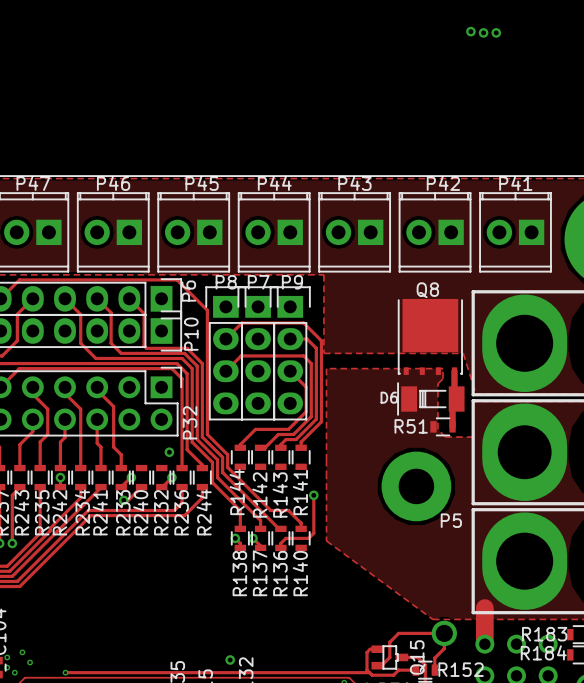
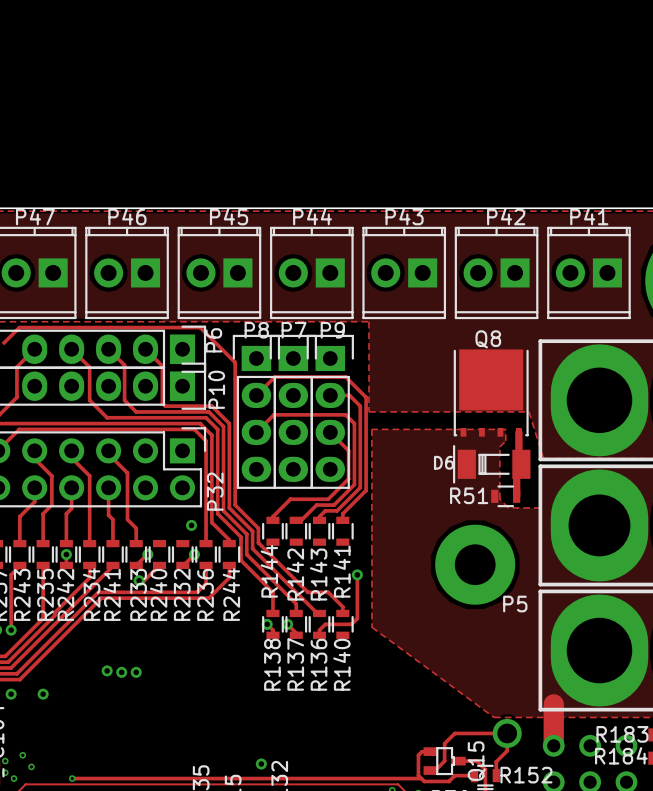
via: (470, 31) -> none
via: (483, 32) -> none
via: (496, 32) -> none
via: none -> (107, 670)
via: none -> (121, 672)
via: none -> (136, 672)
via: none -> (11, 694)
via: none -> (43, 694)

